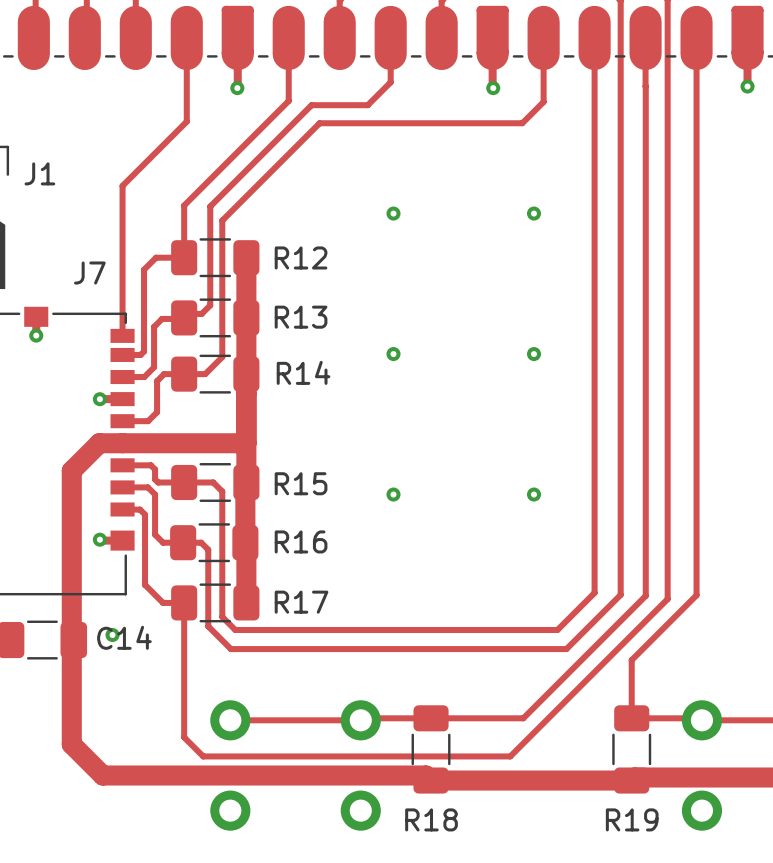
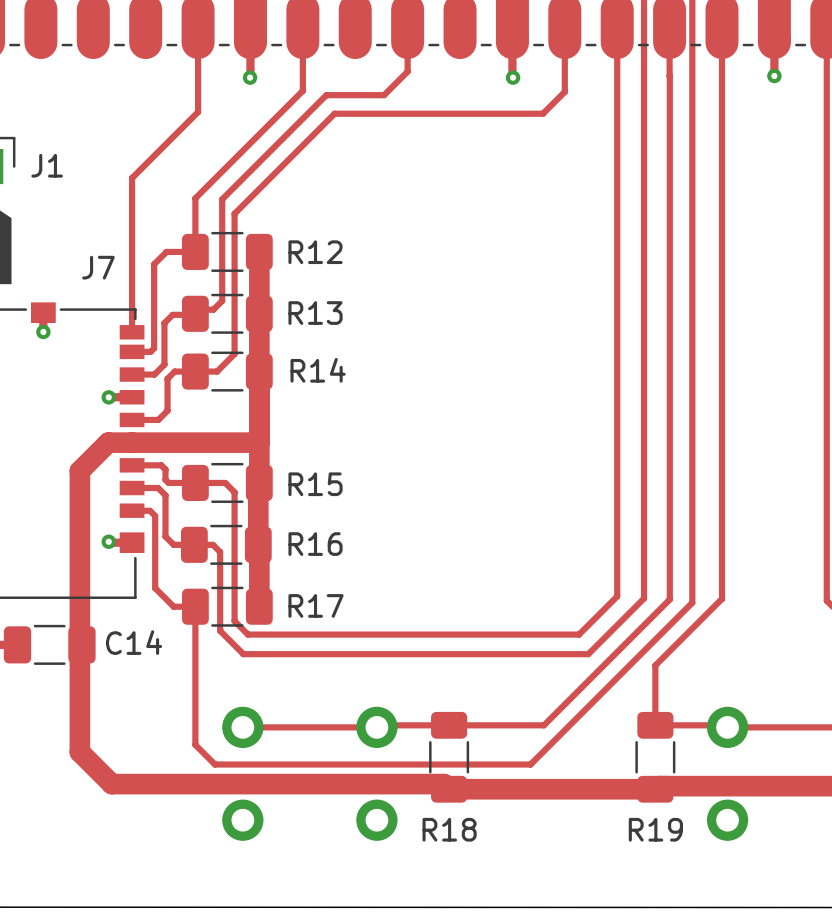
via: (393, 213) -> none
via: (533, 213) -> none
via: (393, 354) -> none
via: (533, 354) -> none
via: (393, 494) -> none
via: (533, 494) -> none
via: (112, 635) -> none

